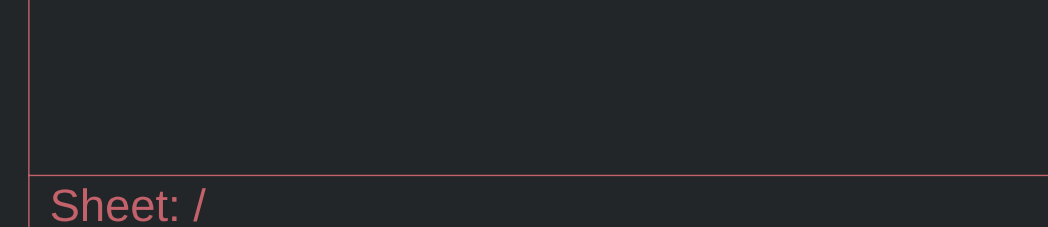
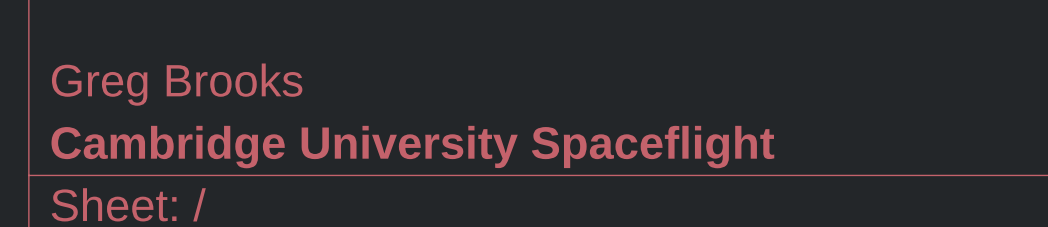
title block: none -> Greg Brooks (177, 84)
title block: none -> Cambridge University Spaceflight (412, 147)

